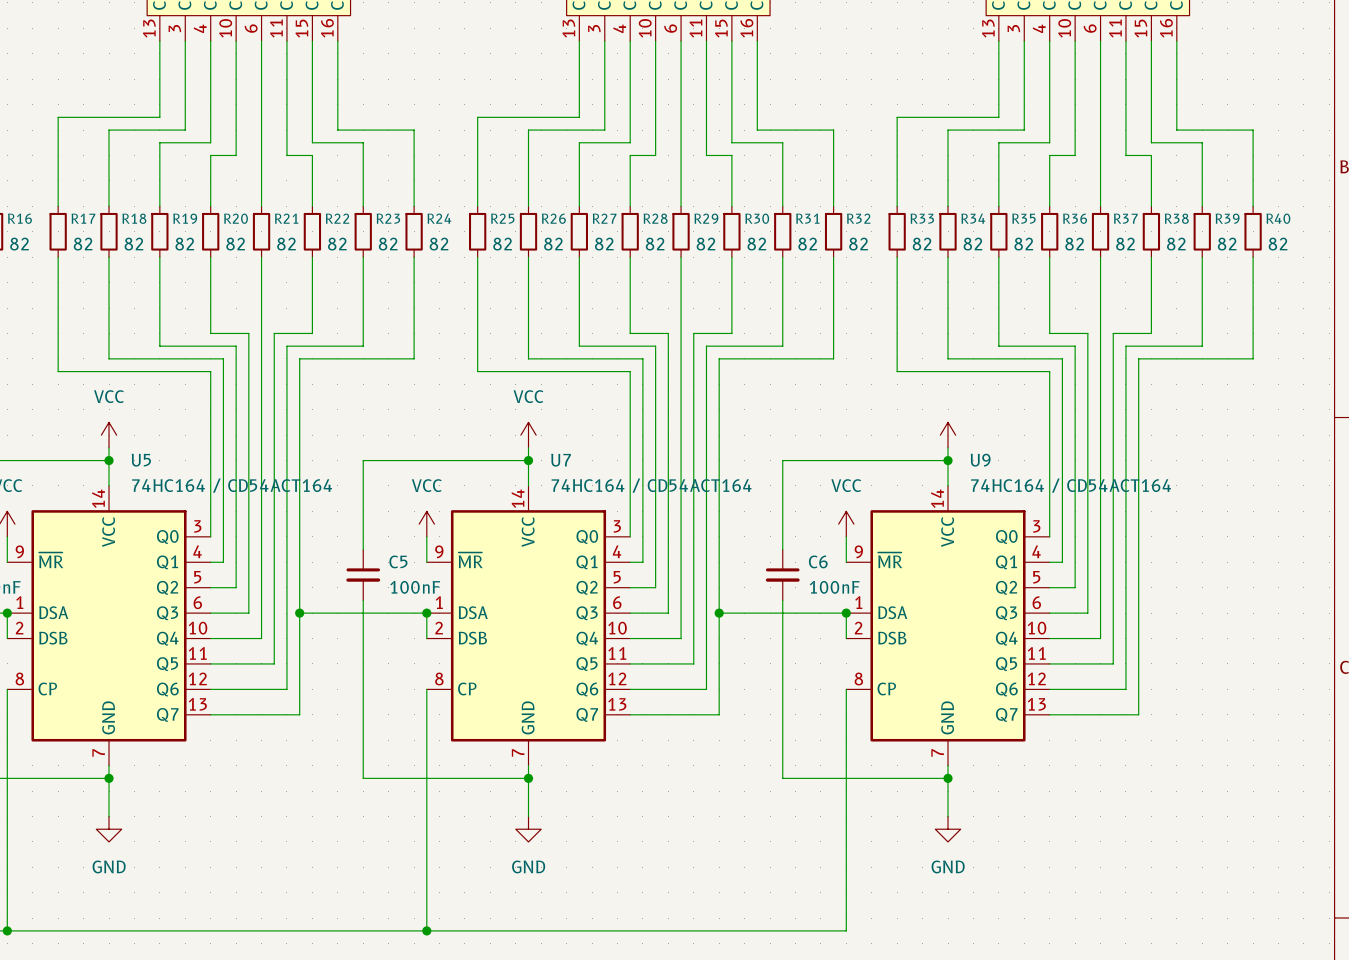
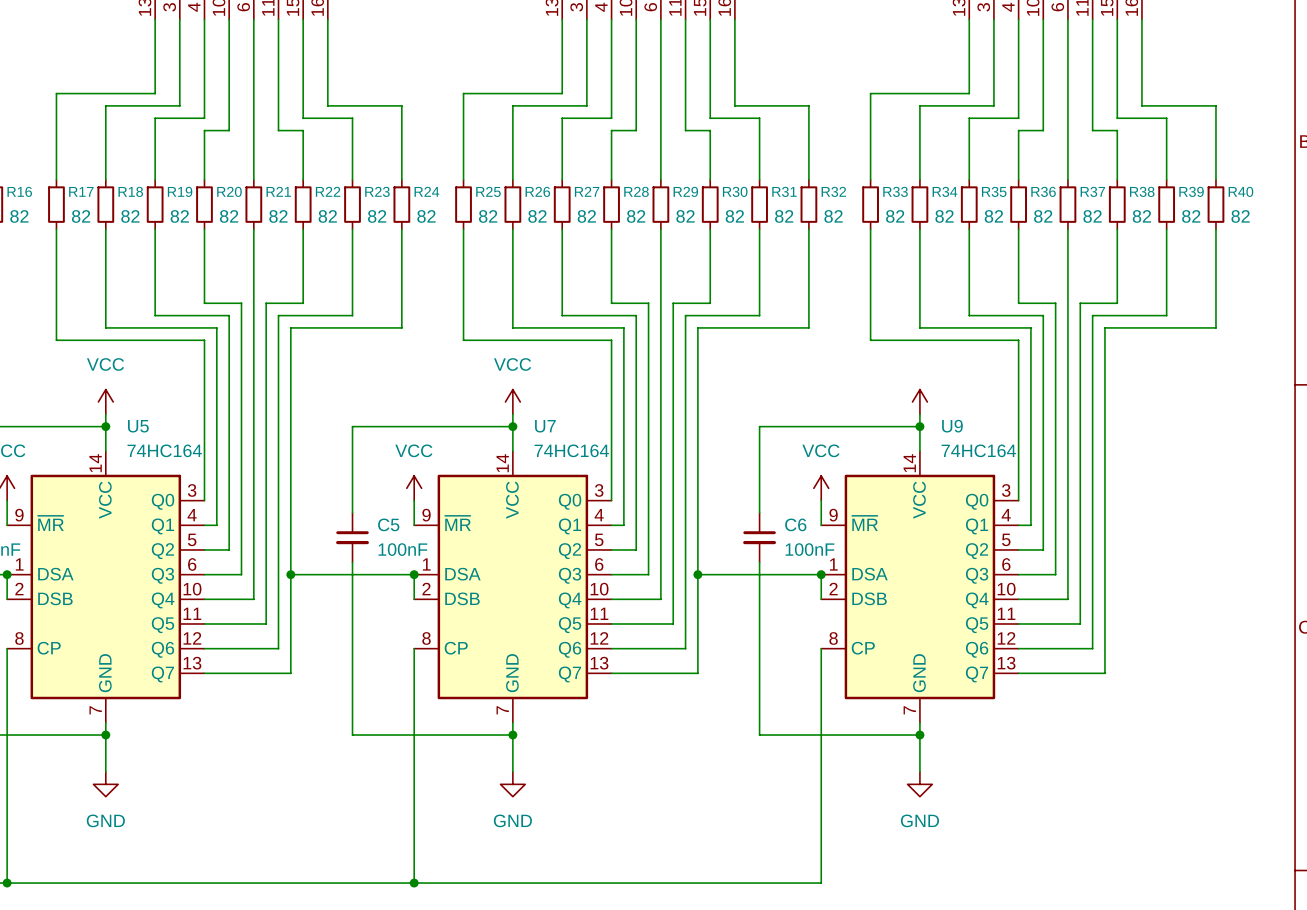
U5 value: 74HC164 / CD54ACT164 (232, 485) -> 74HC164 (164, 450)
U7 value: 74HC164 / CD54ACT164 (651, 485) -> 74HC164 (571, 450)
U9 value: 74HC164 / CD54ACT164 (1071, 485) -> 74HC164 (978, 450)

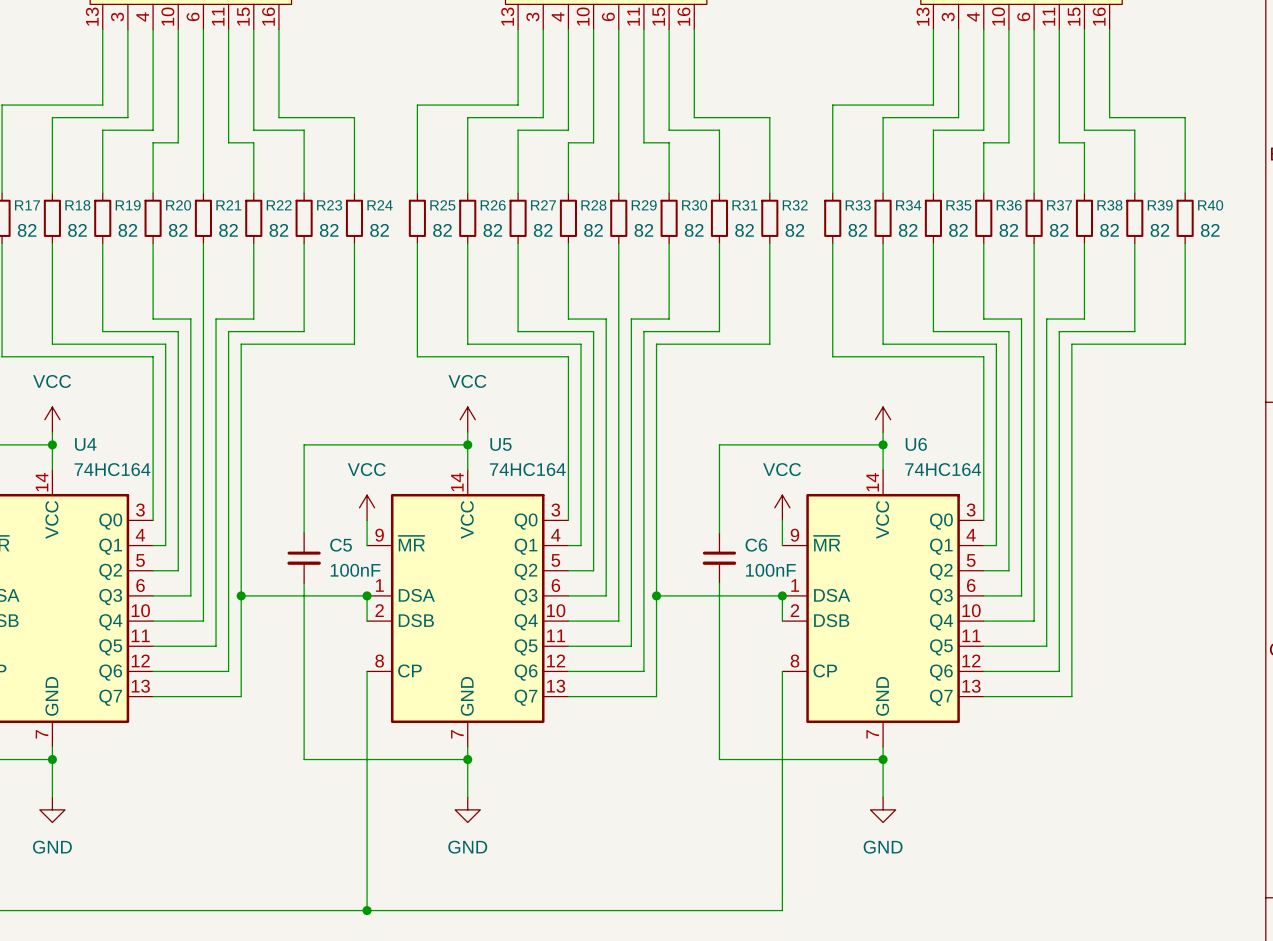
U5 name: U5 (138, 426) -> U4 (85, 444)
U7 name: U7 (545, 426) -> U5 (500, 444)
U9 name: U9 (952, 426) -> U6 (916, 444)

